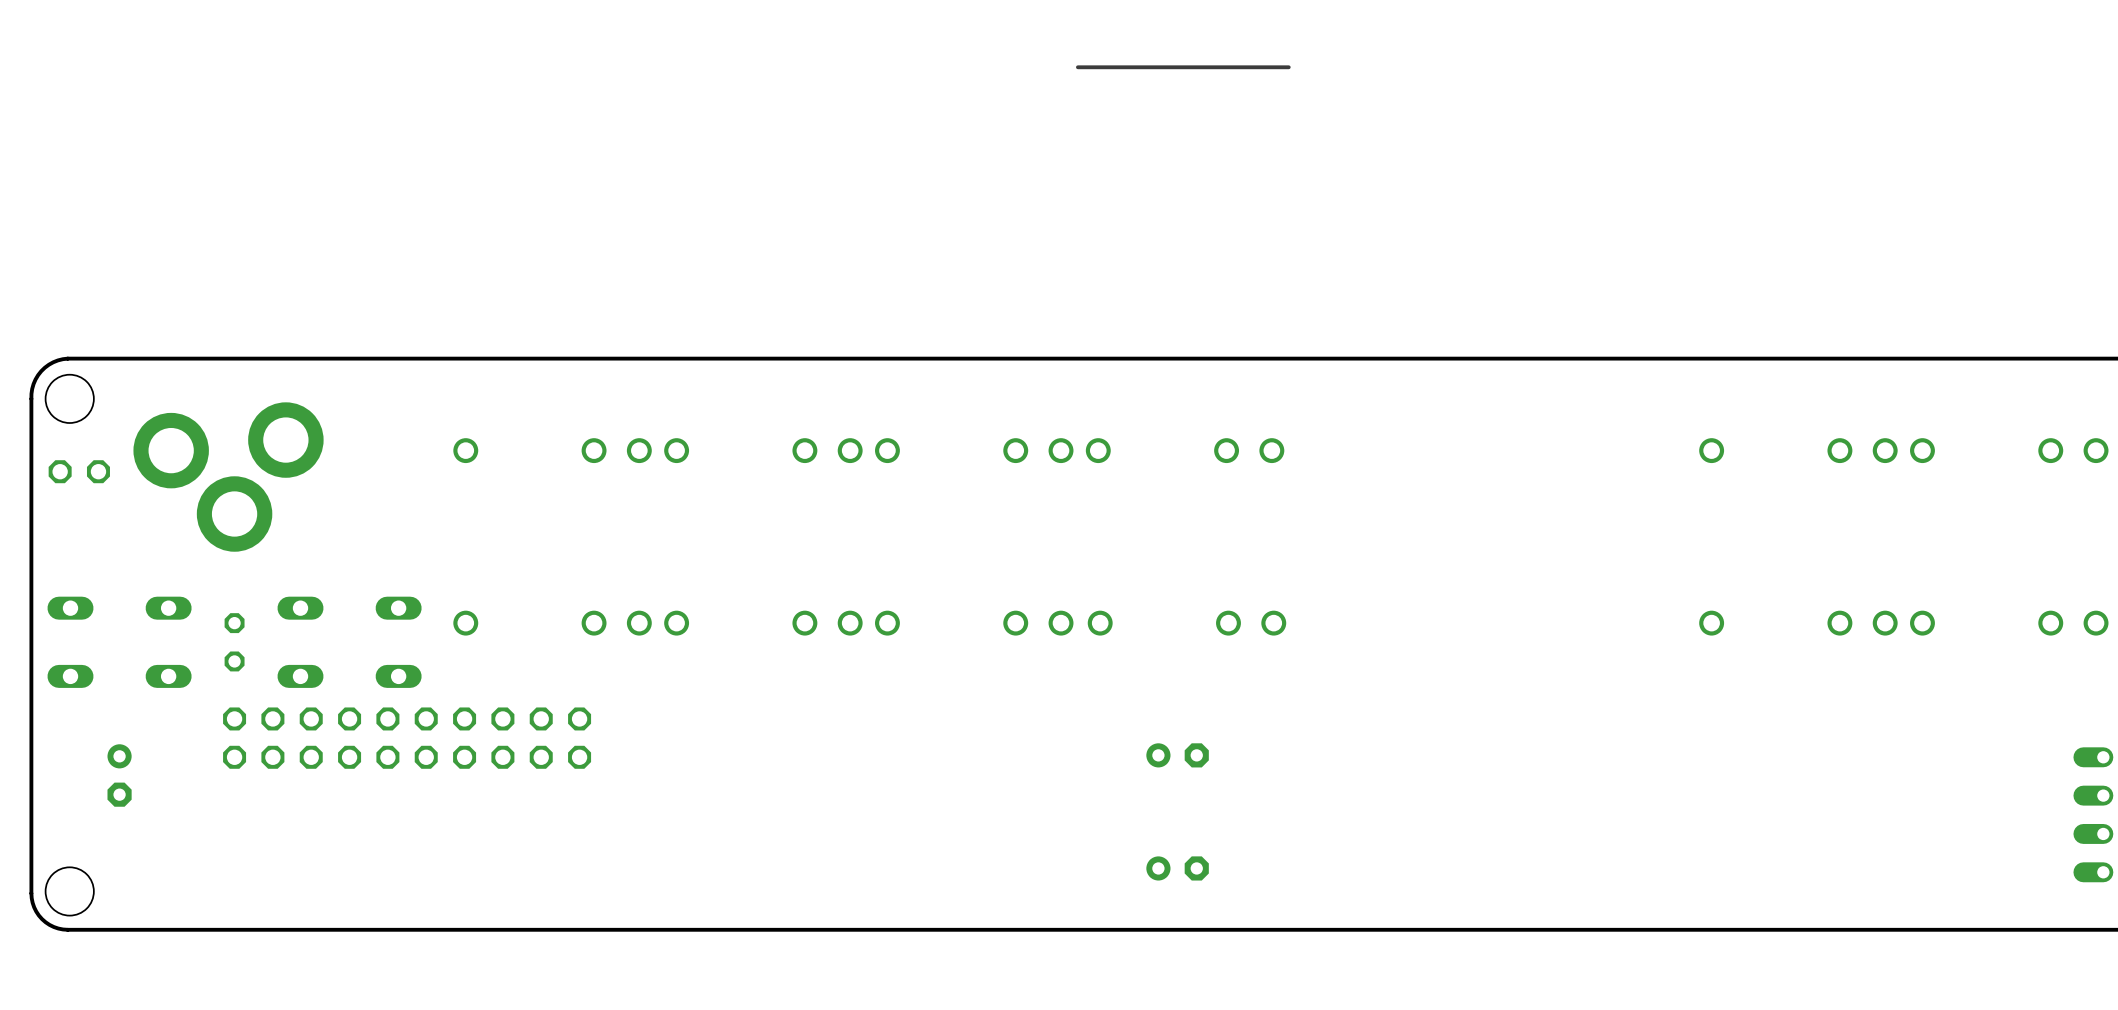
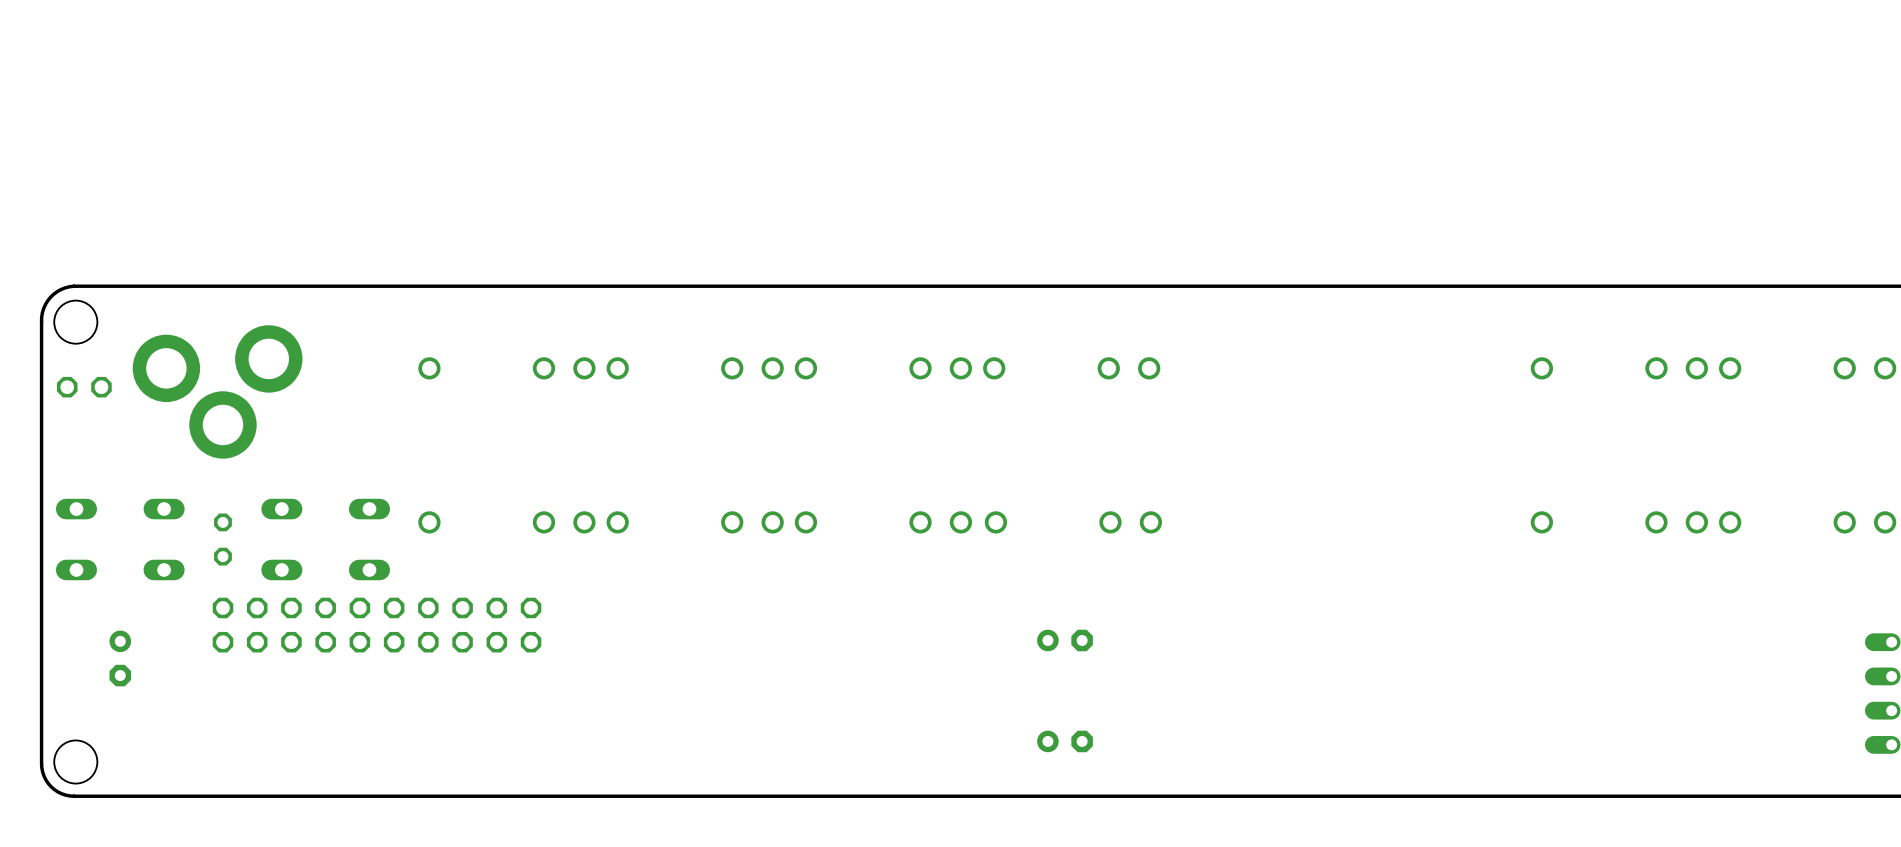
line: (1288, 67) (1077, 67) -> none

